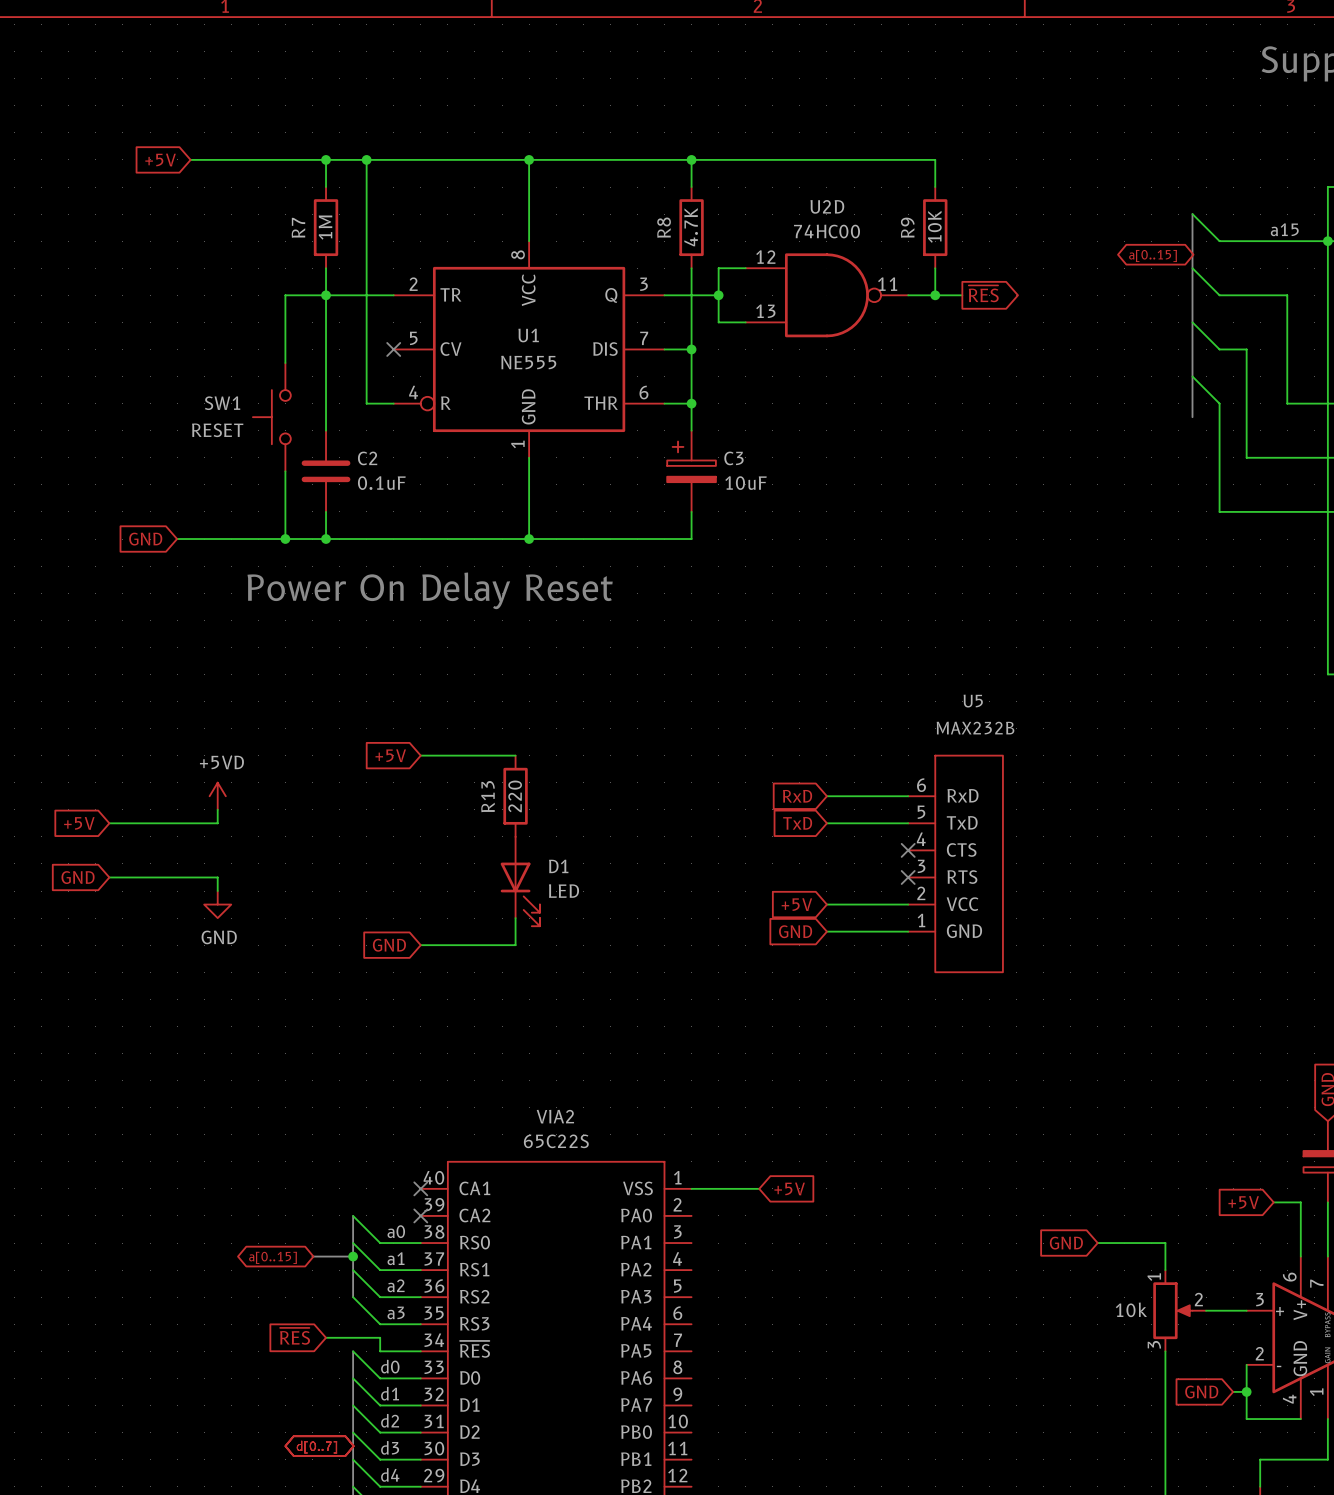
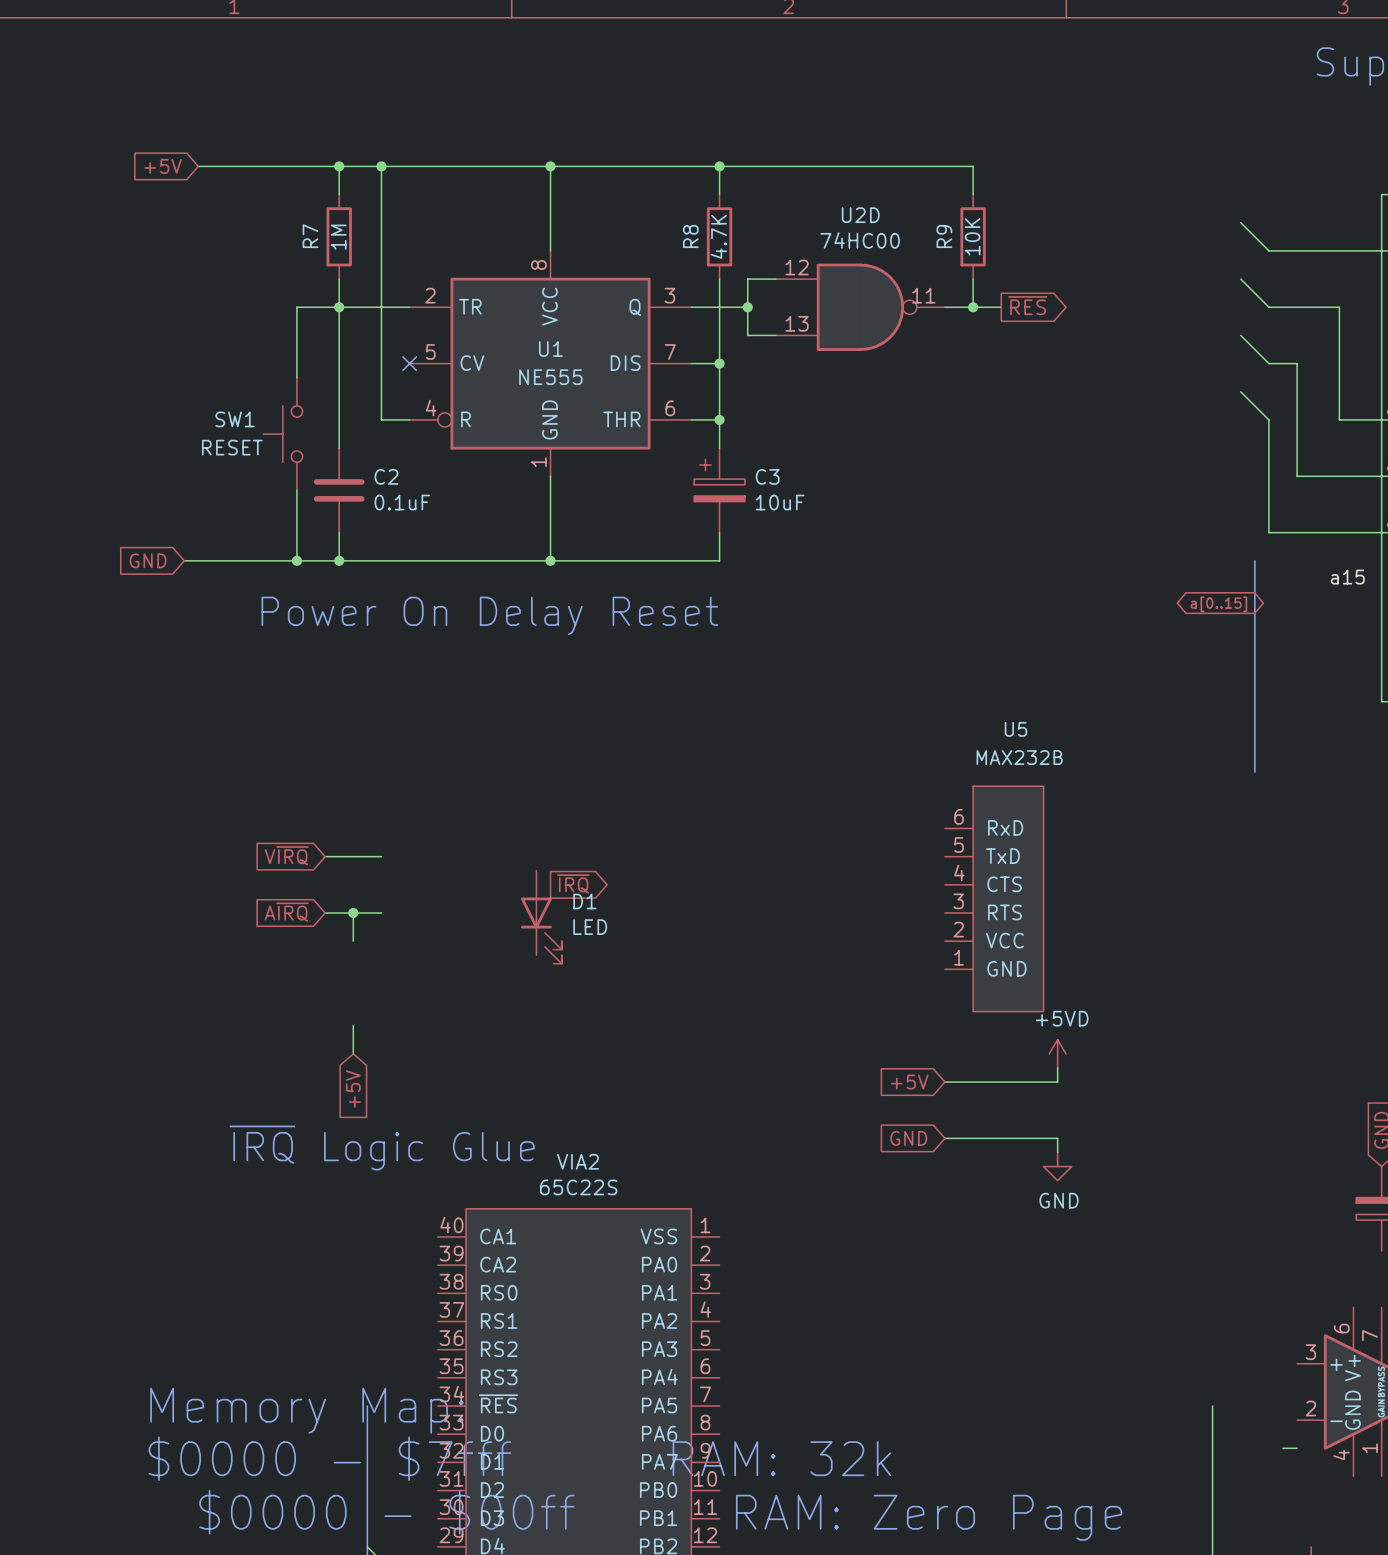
bus: (1192, 214) (1192, 417) -> none
label: a15 (1284, 229) -> none
junction: (1327, 241) -> none
global label: a[0..15] (1153, 256) -> none
bus: none -> (1254, 560) (1254, 772)
label: none -> a15 (1347, 577)
global label: none -> a[0..15] (1218, 604)
global label: +5V (390, 755) -> none
wire: (420, 755) (515, 755) -> none
power symbol: +5VD (217, 796) -> none
R13: 220 (515, 796) -> none
global label: RxD (797, 796) -> none
wire: (826, 796) (908, 796) -> none
wire: (217, 809) (217, 823) (109, 823) -> none
global label: none -> V~{IRQ} (286, 855)
global label: +5V (79, 823) -> none
wire: none -> (325, 856) (381, 856)
global label: TxD (797, 823) -> none
wire: (826, 823) (908, 823) -> none
global label: none -> ~{IRQ} (573, 883)
no-connect mark: (908, 850) -> none
global label: none -> A~{IRQ} (286, 912)
global label: GND (78, 877) -> none
wire: (109, 877) (217, 877) (217, 891) -> none
wire: none -> (325, 912) (381, 912)
wire: none -> (353, 912) (353, 941)
junction: none -> (353, 912)
no-connect mark: (908, 877) -> none
power symbol: GND (217, 904) -> none
global label: +5V (796, 904) -> none
wire: (826, 904) (908, 904) -> none
wire: (515, 918) (515, 945) (420, 945) -> none
global label: GND (795, 931) -> none
wire: (826, 931) (908, 931) -> none
global label: GND (389, 945) -> none
wire: none -> (353, 1025) (353, 1053)
power symbol: none -> +5VD (1057, 1053)
wire: none -> (1057, 1067) (1057, 1082) (944, 1082)
global label: none -> +5V (909, 1082)
global label: none -> +5V (353, 1089)
global label: none -> GND (908, 1138)
wire: none -> (944, 1138) (1057, 1138) (1057, 1152)
text: none -> ~{IRQ} Logic Glue (382, 1148)
power symbol: none -> GND (1057, 1166)
no-connect mark: (420, 1188) -> none
wire: (691, 1188) (759, 1188) -> none
global label: +5V (789, 1188) -> none
global label: +5V (1243, 1202) -> none
wire: (1273, 1202) (1300, 1202) (1300, 1256) -> none
wire: (1327, 1202) (1327, 1256) -> none
wire: (353, 1215) (380, 1243) (420, 1243) -> none
bus: (353, 1215) (353, 1297) -> none
no-connect mark: (420, 1215) -> none
label: a0 (396, 1231) -> none
wire: (353, 1243) (380, 1270) (420, 1270) -> none
global label: GND (1066, 1243) -> none
wire: (1097, 1243) (1165, 1243) (1165, 1270) -> none
bus: (312, 1256) (353, 1256) -> none
junction: (353, 1256) -> none
global label: a[0..15] (273, 1257) -> none
label: a1 (396, 1258) -> none
wire: (353, 1270) (380, 1297) (420, 1297) -> none
label: a2 (396, 1285) -> none
wire: (353, 1297) (380, 1324) (420, 1324) -> none
part: 10k (1179, 1310) -> none
wire: (1206, 1310) (1246, 1310) -> none
label: a3 (396, 1312) -> none
global label: ~{RES} (295, 1336) -> none
wire: (326, 1337) (380, 1337) (380, 1351) (420, 1351) -> none
wire: (353, 1351) (380, 1378) (420, 1378) -> none
text: none -> Memory Map: (306, 1410)
wire: (1246, 1364) (1246, 1419) (1300, 1419) -> none
label: d0 (390, 1366) -> none
wire: (353, 1378) (380, 1405) (420, 1405) -> none
junction: (1246, 1391) -> none
global label: GND (1201, 1392) -> none
label: d1 (390, 1393) -> none
text: none -> $0000 - $7fff RAM: 32k (519, 1458)
wire: (353, 1405) (380, 1432) (420, 1432) -> none
wire: (1327, 1419) (1327, 1459) (1260, 1459) (1260, 1486) -> none
label: d2 (390, 1420) -> none
wire: (353, 1432) (380, 1459) (420, 1459) -> none
global label: d[0..7] (316, 1447) -> none
label: d3 (390, 1447) -> none
text: none -> $0000 - $00ff RAM: Zero Page (660, 1515)
wire: (353, 1459) (380, 1486) (420, 1486) -> none
label: d4 (390, 1474) -> none

